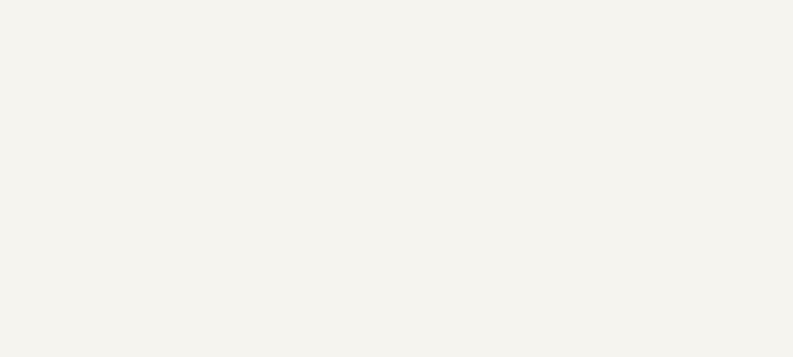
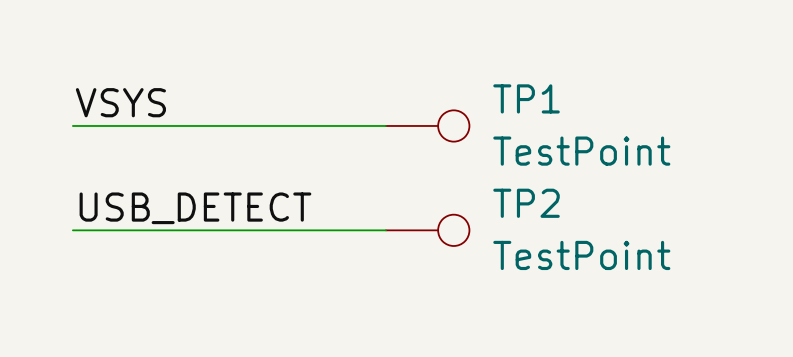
label: none -> VSYS (120, 102)
wire: none -> (72, 125) (385, 125)
TP1: none -> TestPoint (427, 125)
label: none -> USB_DETECT (195, 208)
wire: none -> (72, 230) (385, 230)
TP2: none -> TestPoint (427, 230)

